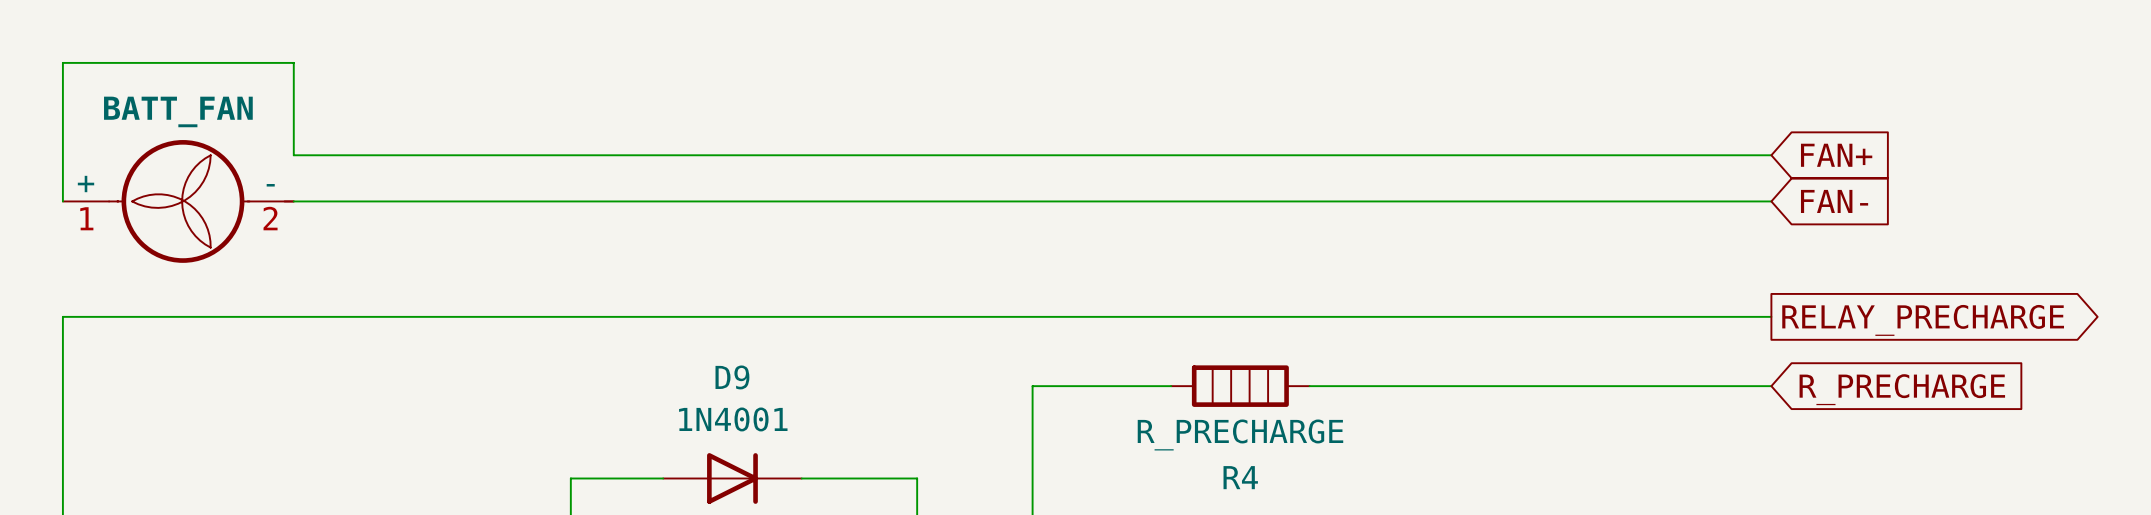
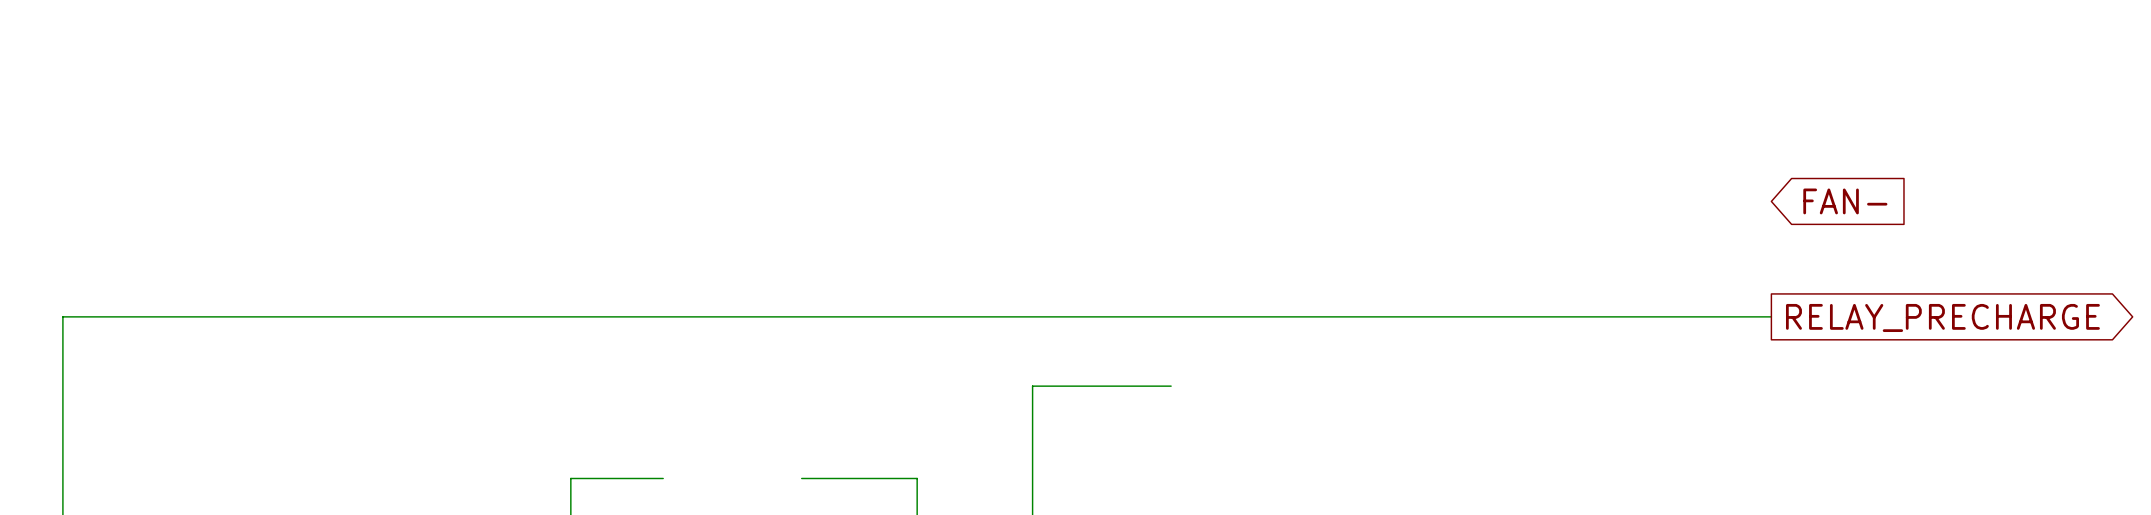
wire: (1771, 155) (293, 155) (293, 62) (62, 62) (62, 201) -> none
global label: FAN+ (1836, 155) -> none
part: BATT_FAN (178, 201) -> none
wire: (293, 201) (1771, 201) -> none
R4: R_PRECHARGE (1240, 386) -> none
wire: (1309, 386) (1771, 386) -> none
global label: R_PRECHARGE (1902, 389) -> none
D9: 1N4001 (732, 478) -> none

